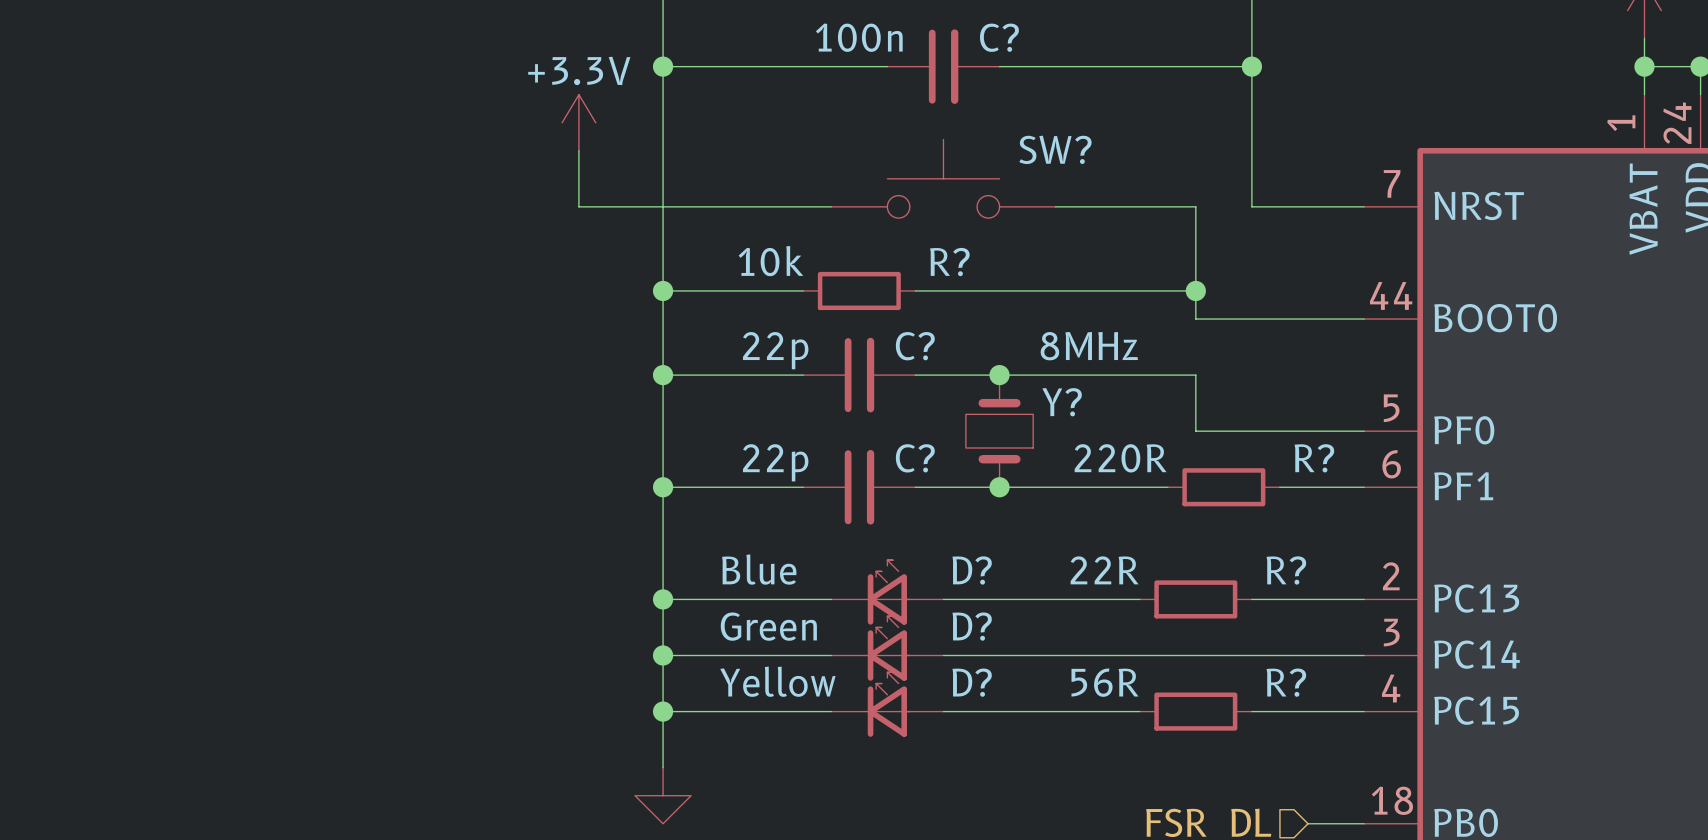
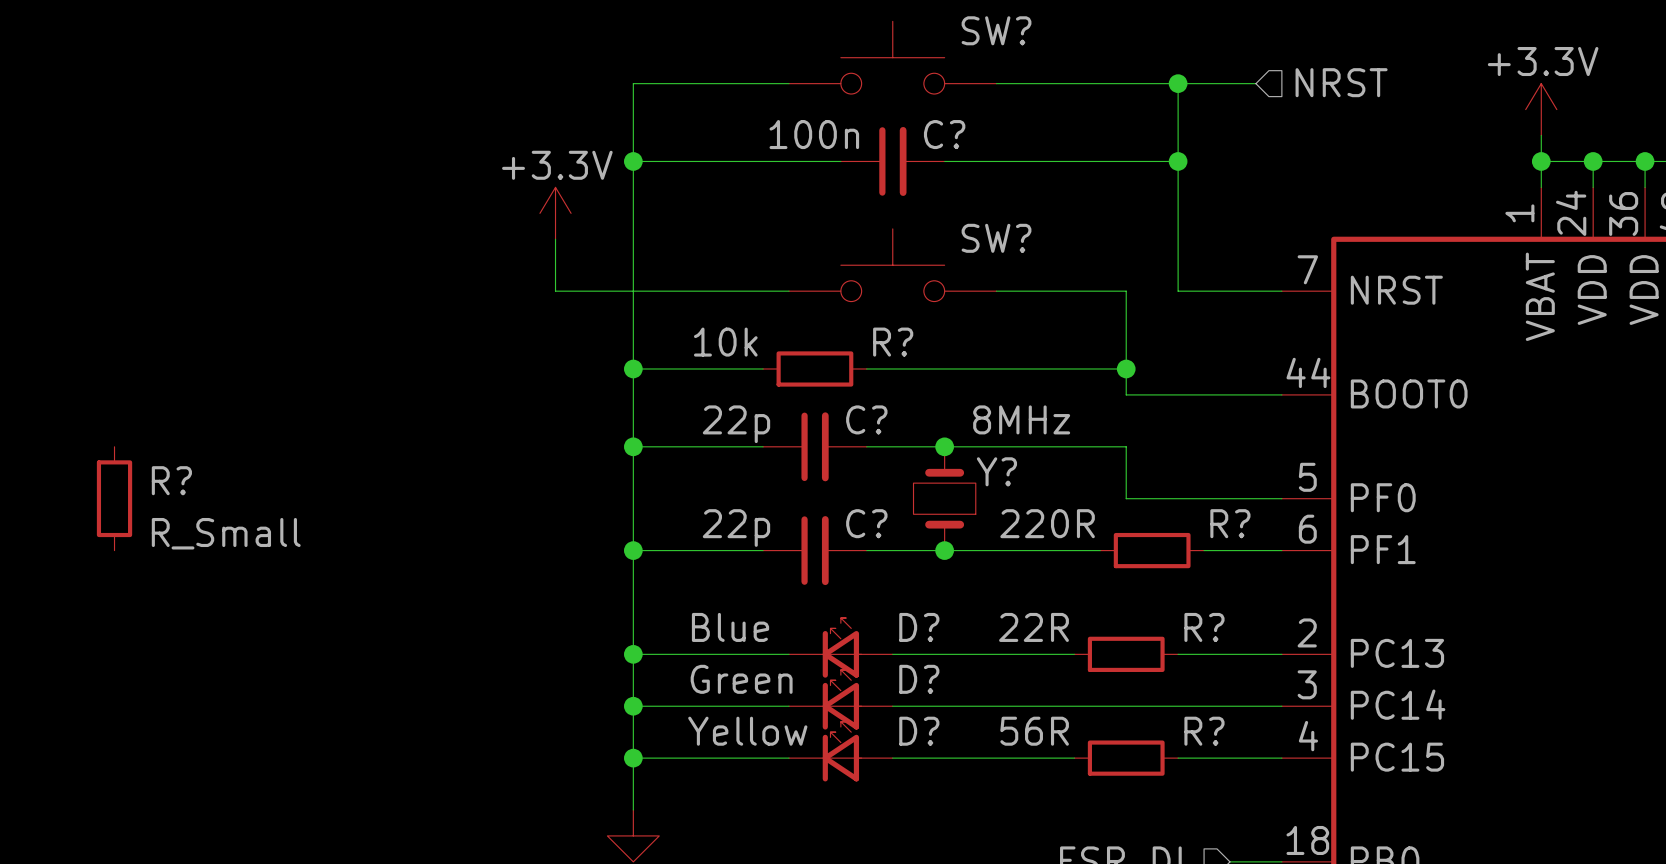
R?: none -> R_Small (114, 498)

